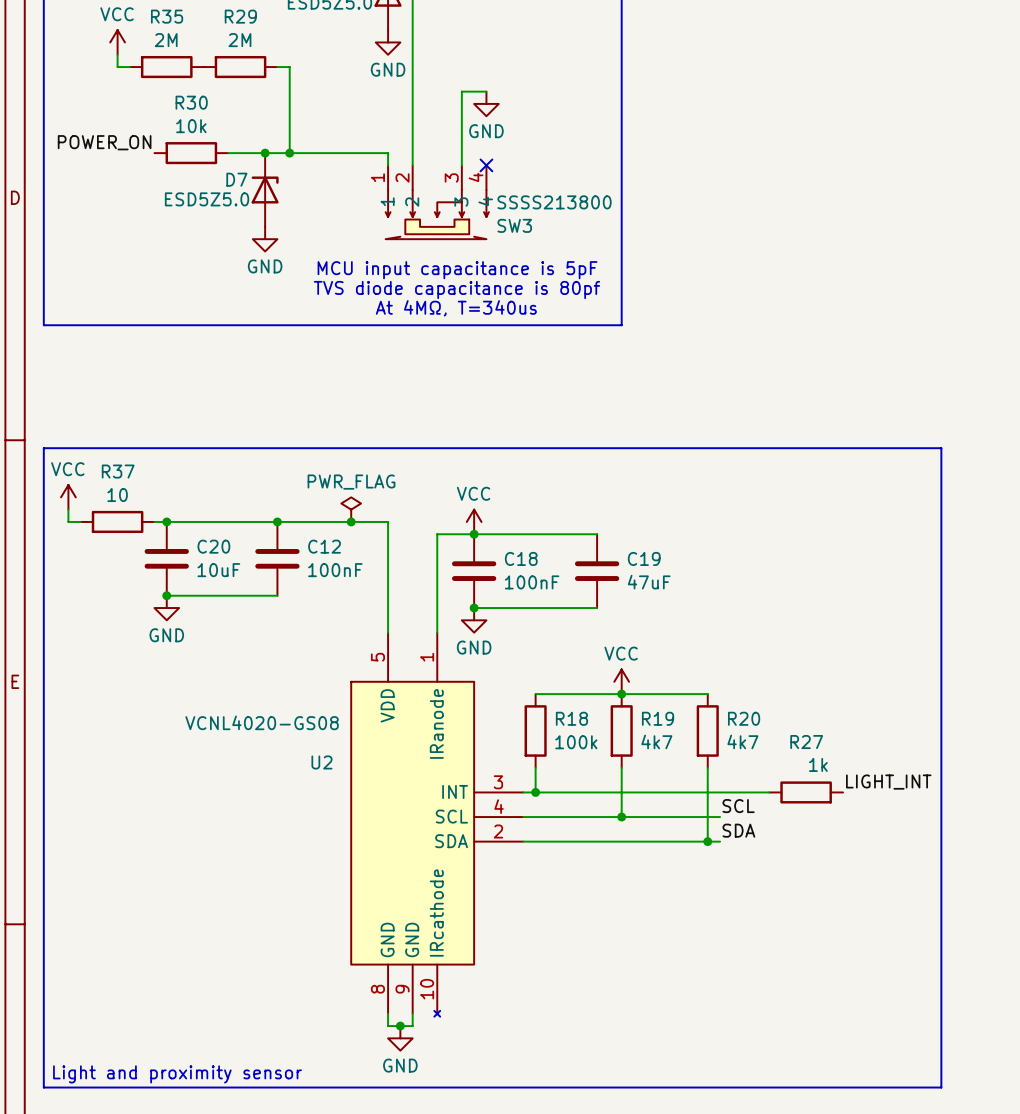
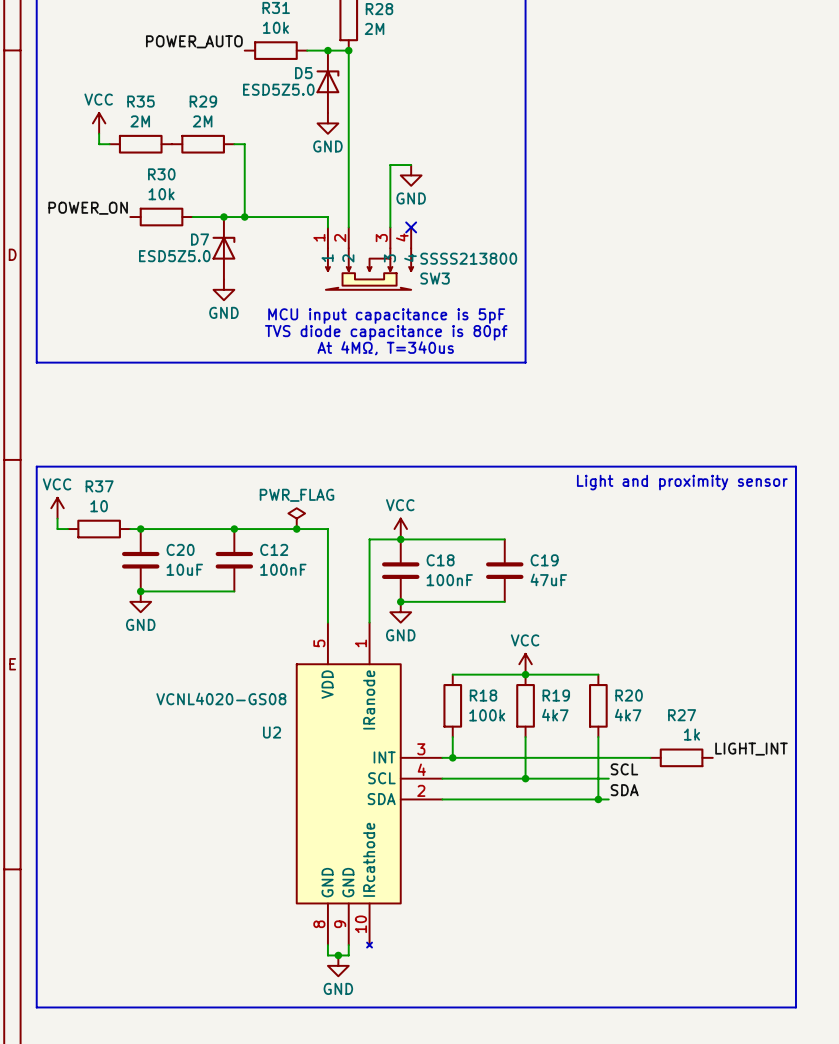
text: none -> Light and proximity sensor (682, 482)
text: Light and proximity sensor (177, 1074) -> none

